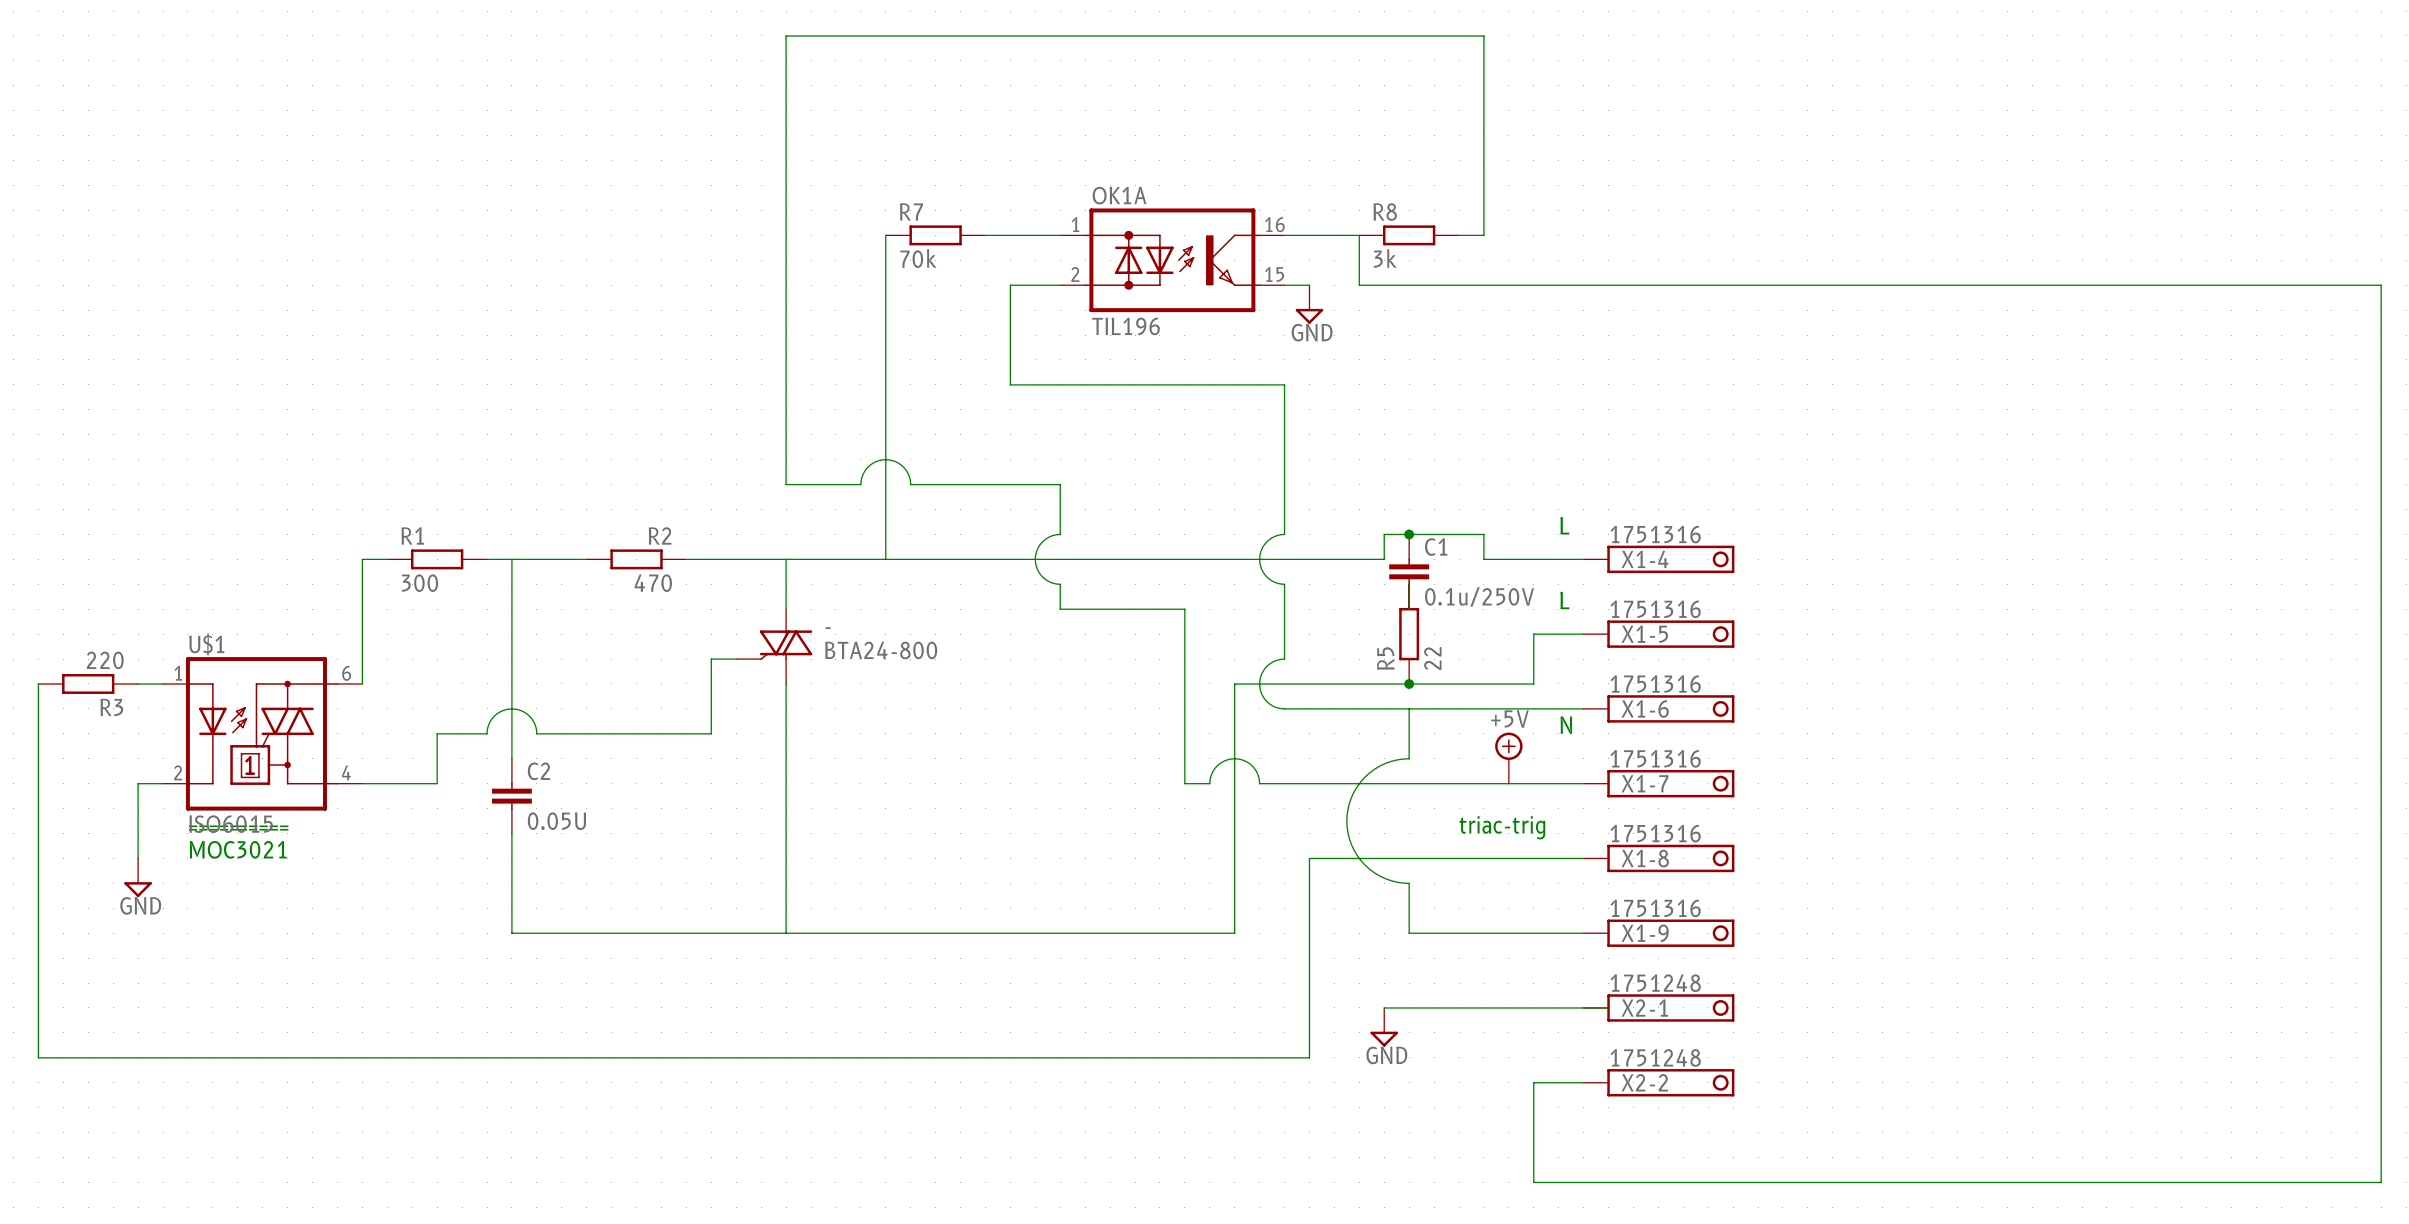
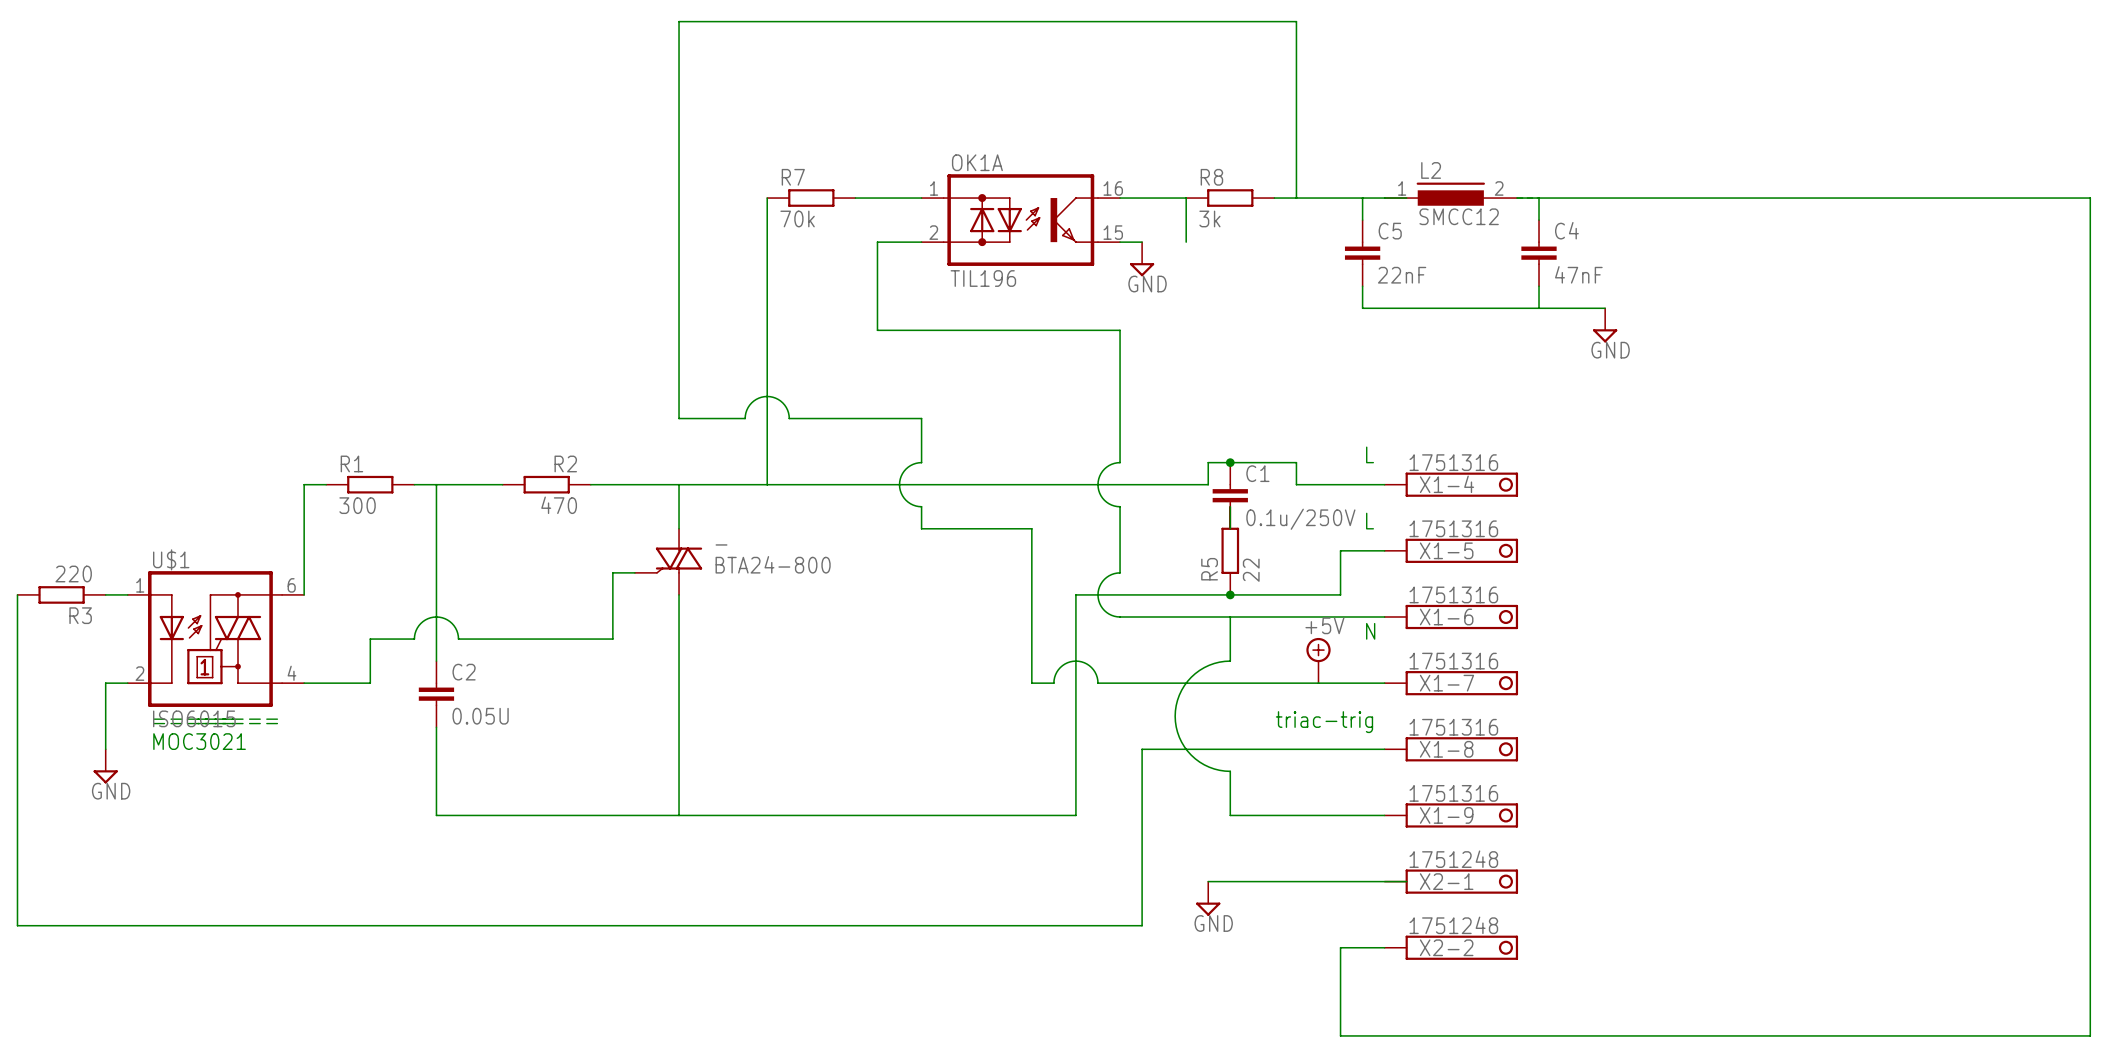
L2: none -> SMCC12 (1450, 194)
wire: none -> (1296, 198) (1406, 198)
wire: none -> (1362, 198) (1362, 220)
wire: (1359, 285) (2381, 285) -> (1539, 220) (1539, 198) (1516, 198) (2090, 198) (2090, 242)
C5: none -> 22nF (1362, 253)
C4: none -> 47nF (1539, 253)
wire: none -> (1362, 286) (1362, 308) (1605, 308)
wire: none -> (1539, 286) (1539, 308)
power symbol: none -> GND (1605, 325)

